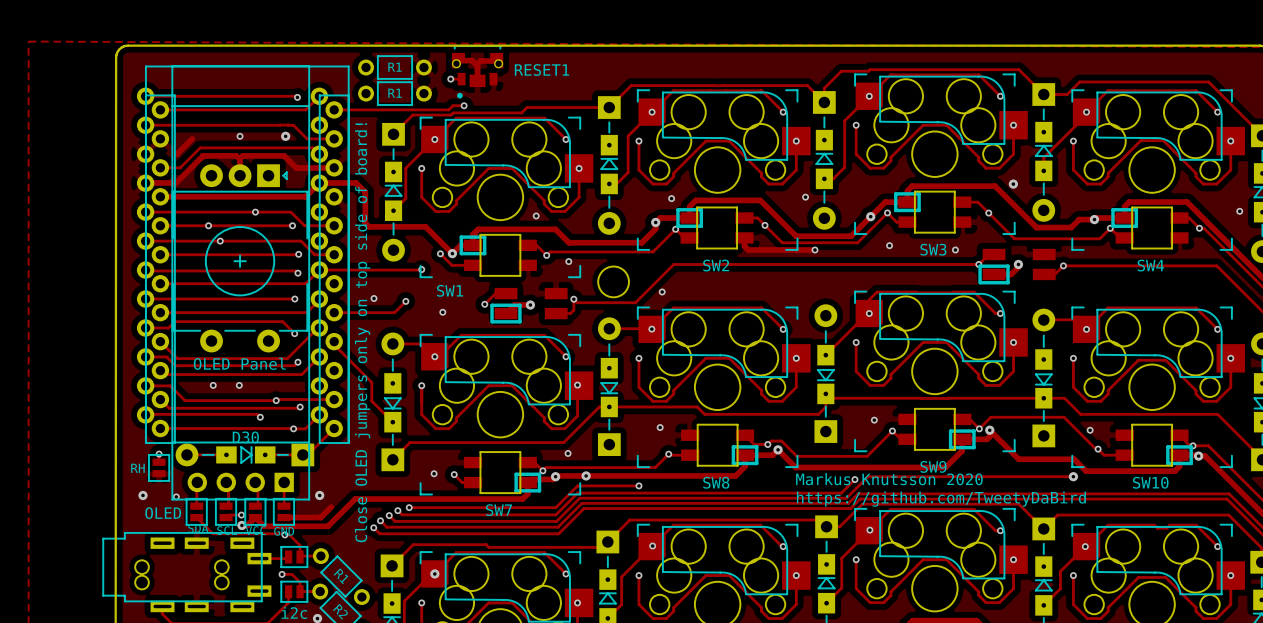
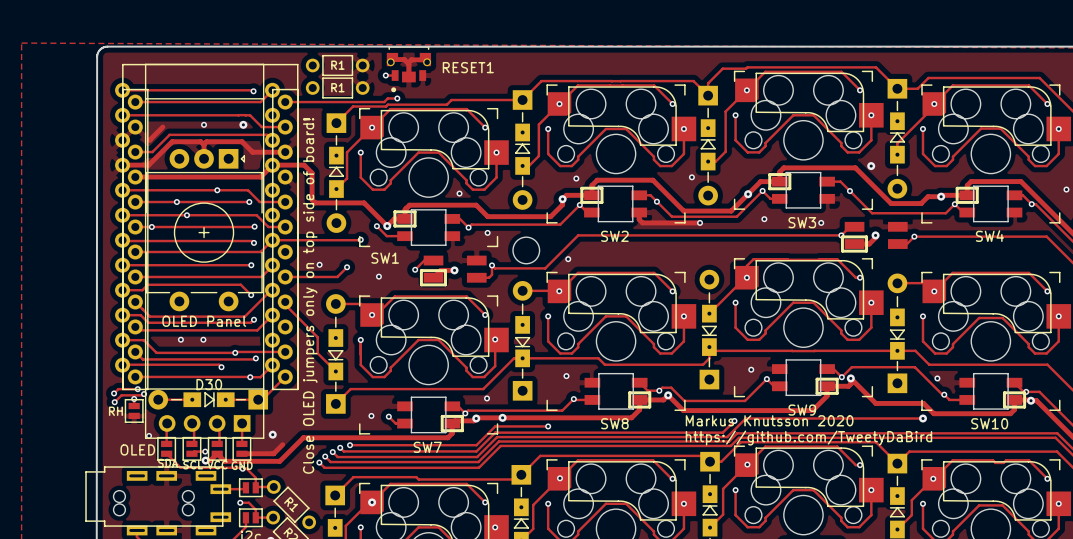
via: none -> (151, 227)
track: none -> (137, 389) (118, 389) (114, 393)
via: none -> (137, 389)
via: none -> (114, 393)
track: none -> (144, 394) (121, 395) (114, 402)
via: none -> (144, 394)
via: none -> (114, 402)
via: (143, 495) -> none

